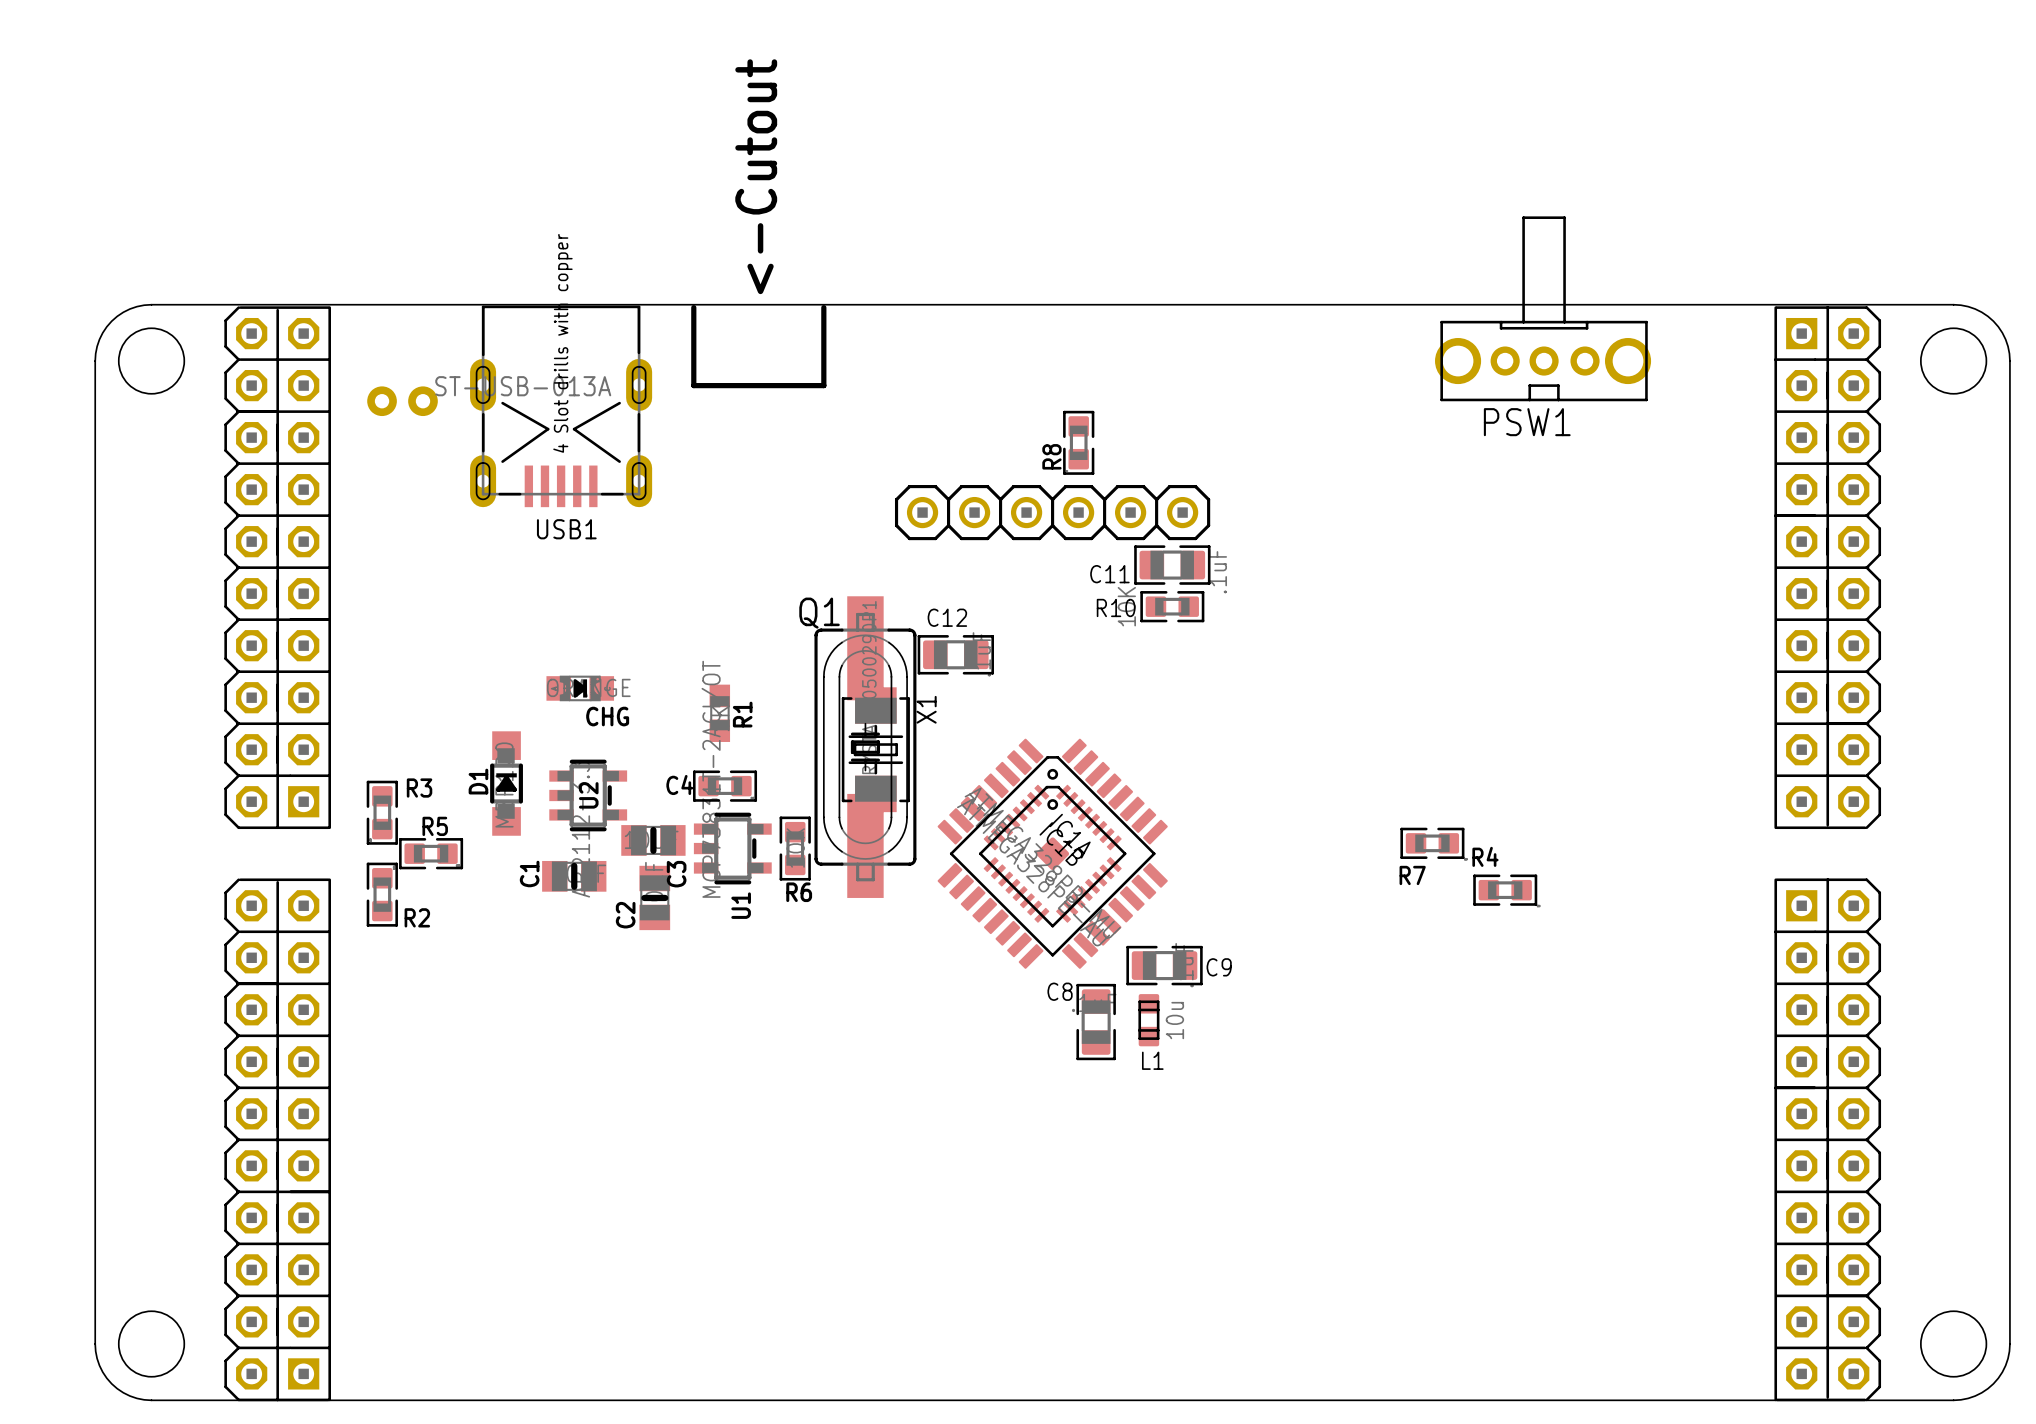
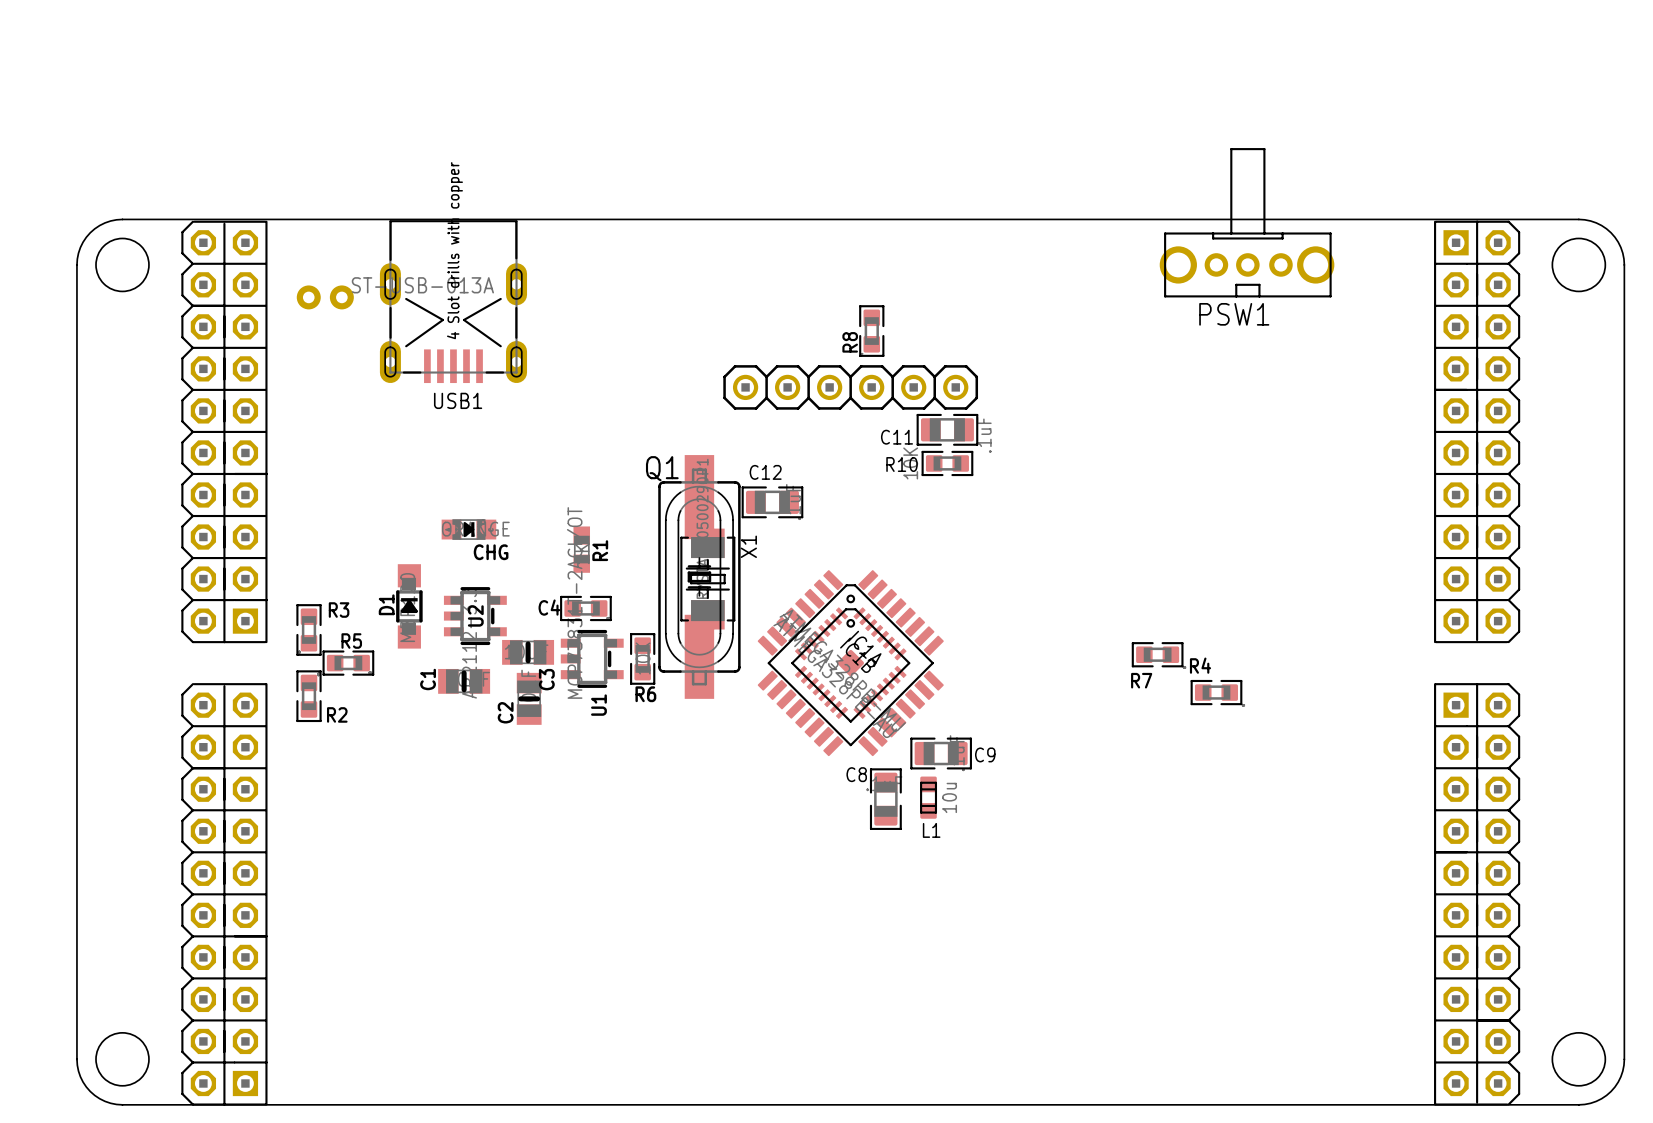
text: <-Cutout (756, 176) -> none
board edge: (693, 307) (693, 385) (823, 385) (823, 307) -> none

